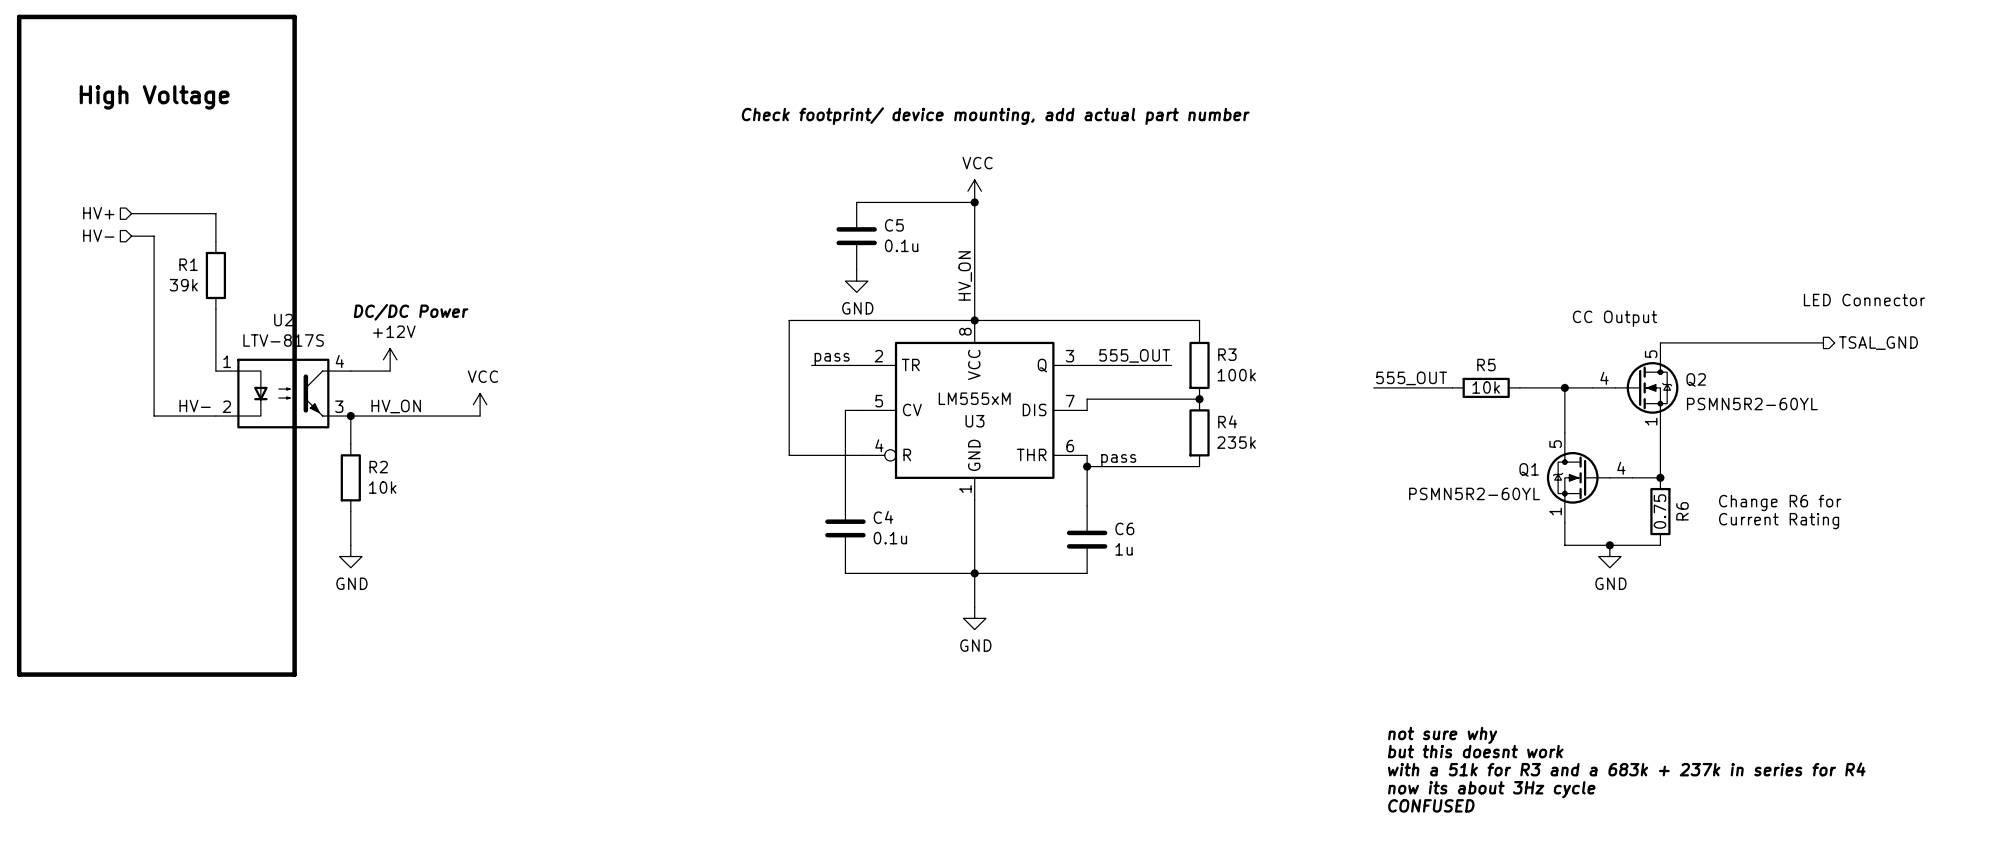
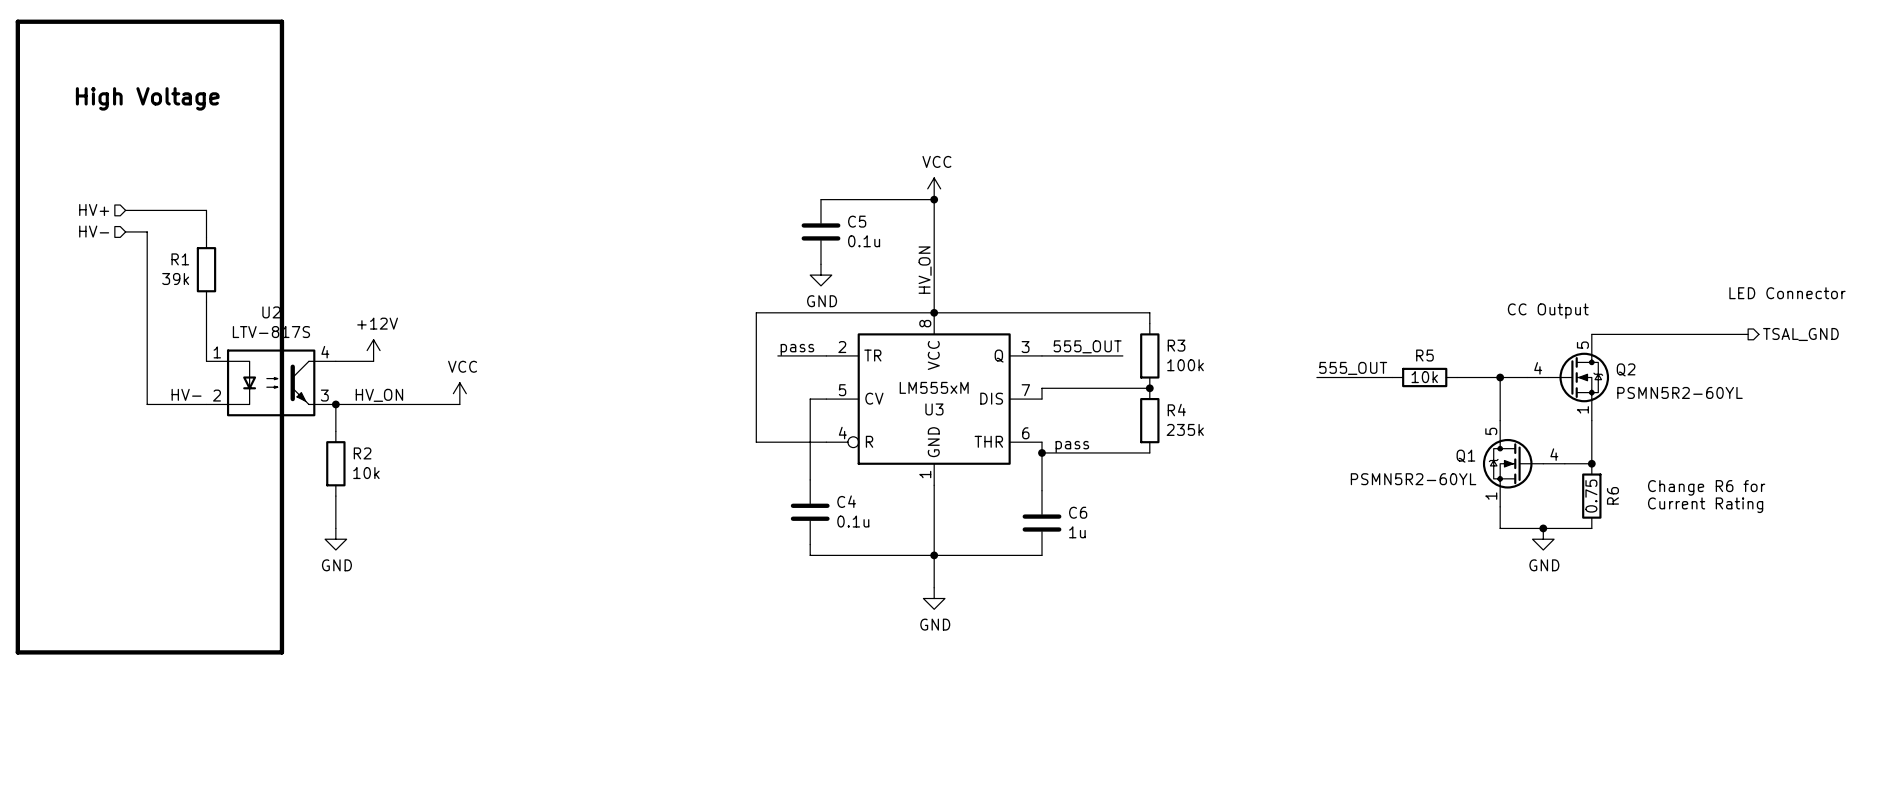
text: Check footprint/ device mounting, add actual part number (995, 116) -> none
text: DC/DC Power (411, 312) -> none
text: not sure why (1442, 735) -> none
text: but this doesnt work (1475, 751) -> none
text: with a 51k for R3 and a 683k + 237k in series for R4 (1626, 769) -> none
text: now its about 3Hz cycle (1491, 789) -> none
text: CONFUSED (1431, 805) -> none

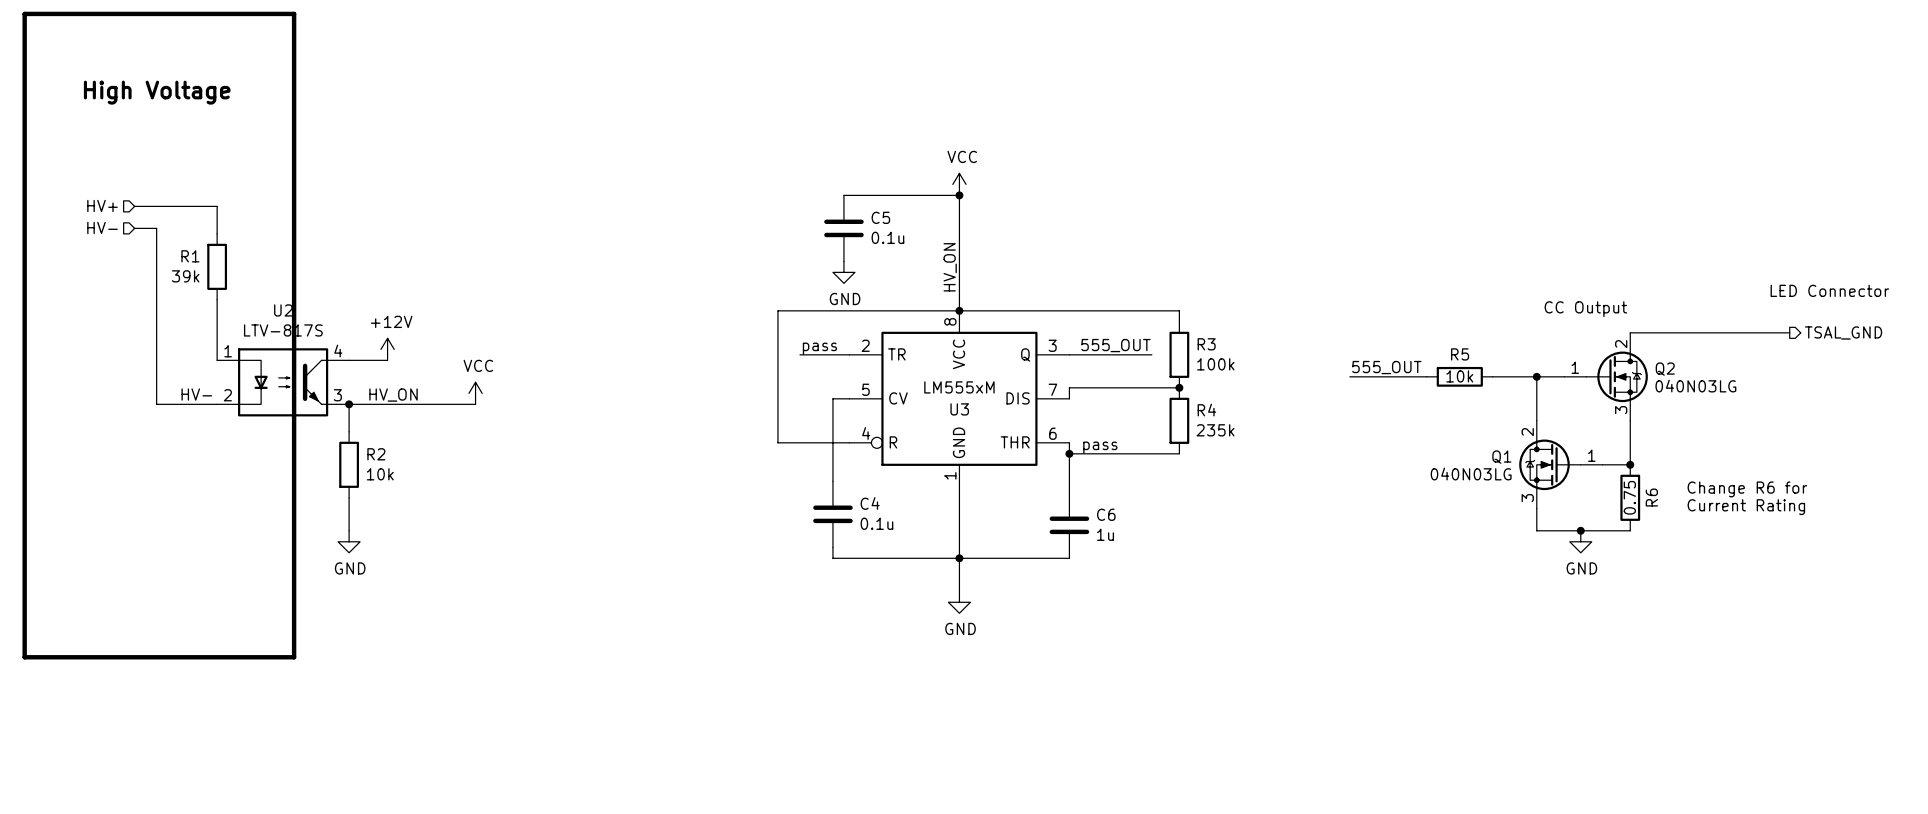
Q2 pin number: 5 (1582, 345) -> 2 (1621, 344)
Q2 pin number: 4 (1538, 368) -> 1 (1575, 367)
Q2 value: PSMN5R2-60YL (1679, 392) -> 040N03LG (1695, 386)
Q2 pin number: 1 (1582, 409) -> 3 (1621, 410)
Q1 pin number: 5 (1491, 431) -> 2 (1527, 432)
Q1 pin number: 4 (1554, 454) -> 1 (1591, 455)
Q1 value: PSMN5R2-60YL (1413, 479) -> 040N03LG (1471, 474)
Q1 pin number: 1 (1491, 496) -> 3 (1527, 498)

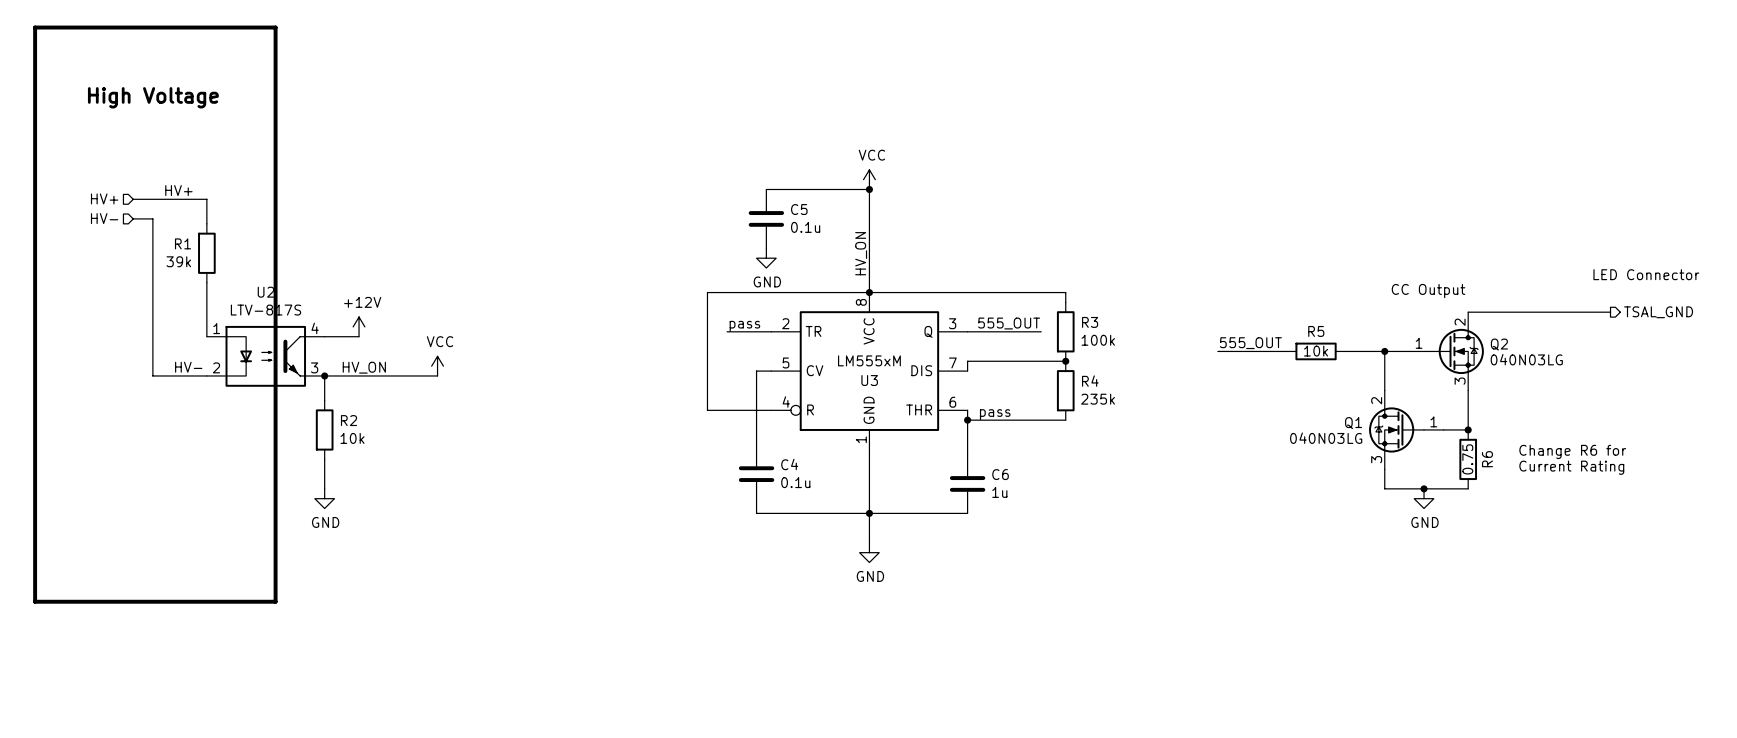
label: none -> HV+ (178, 190)

